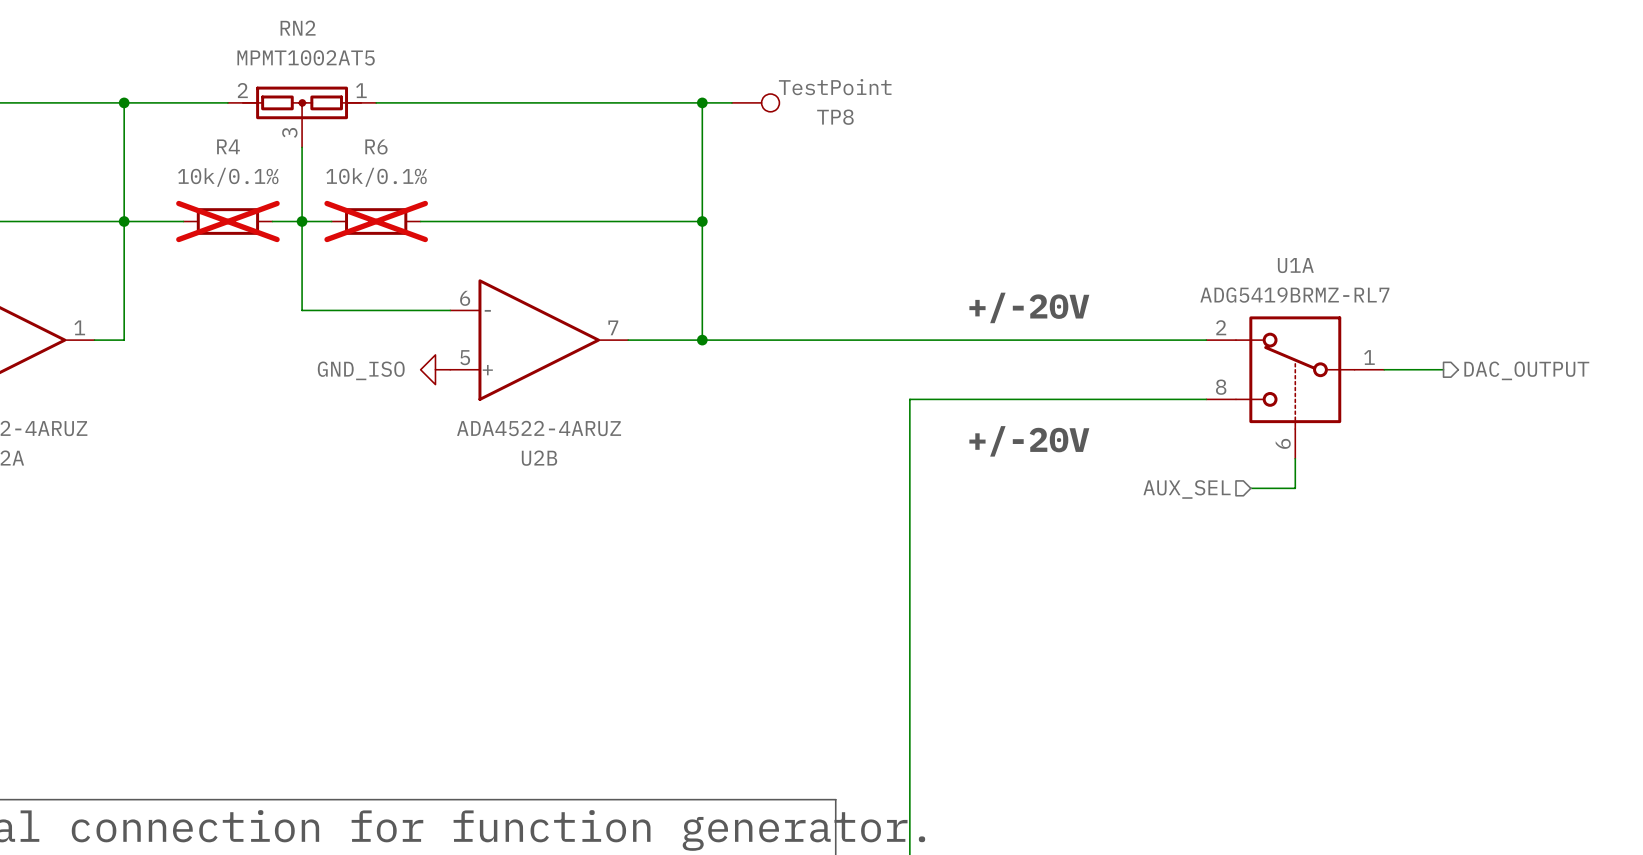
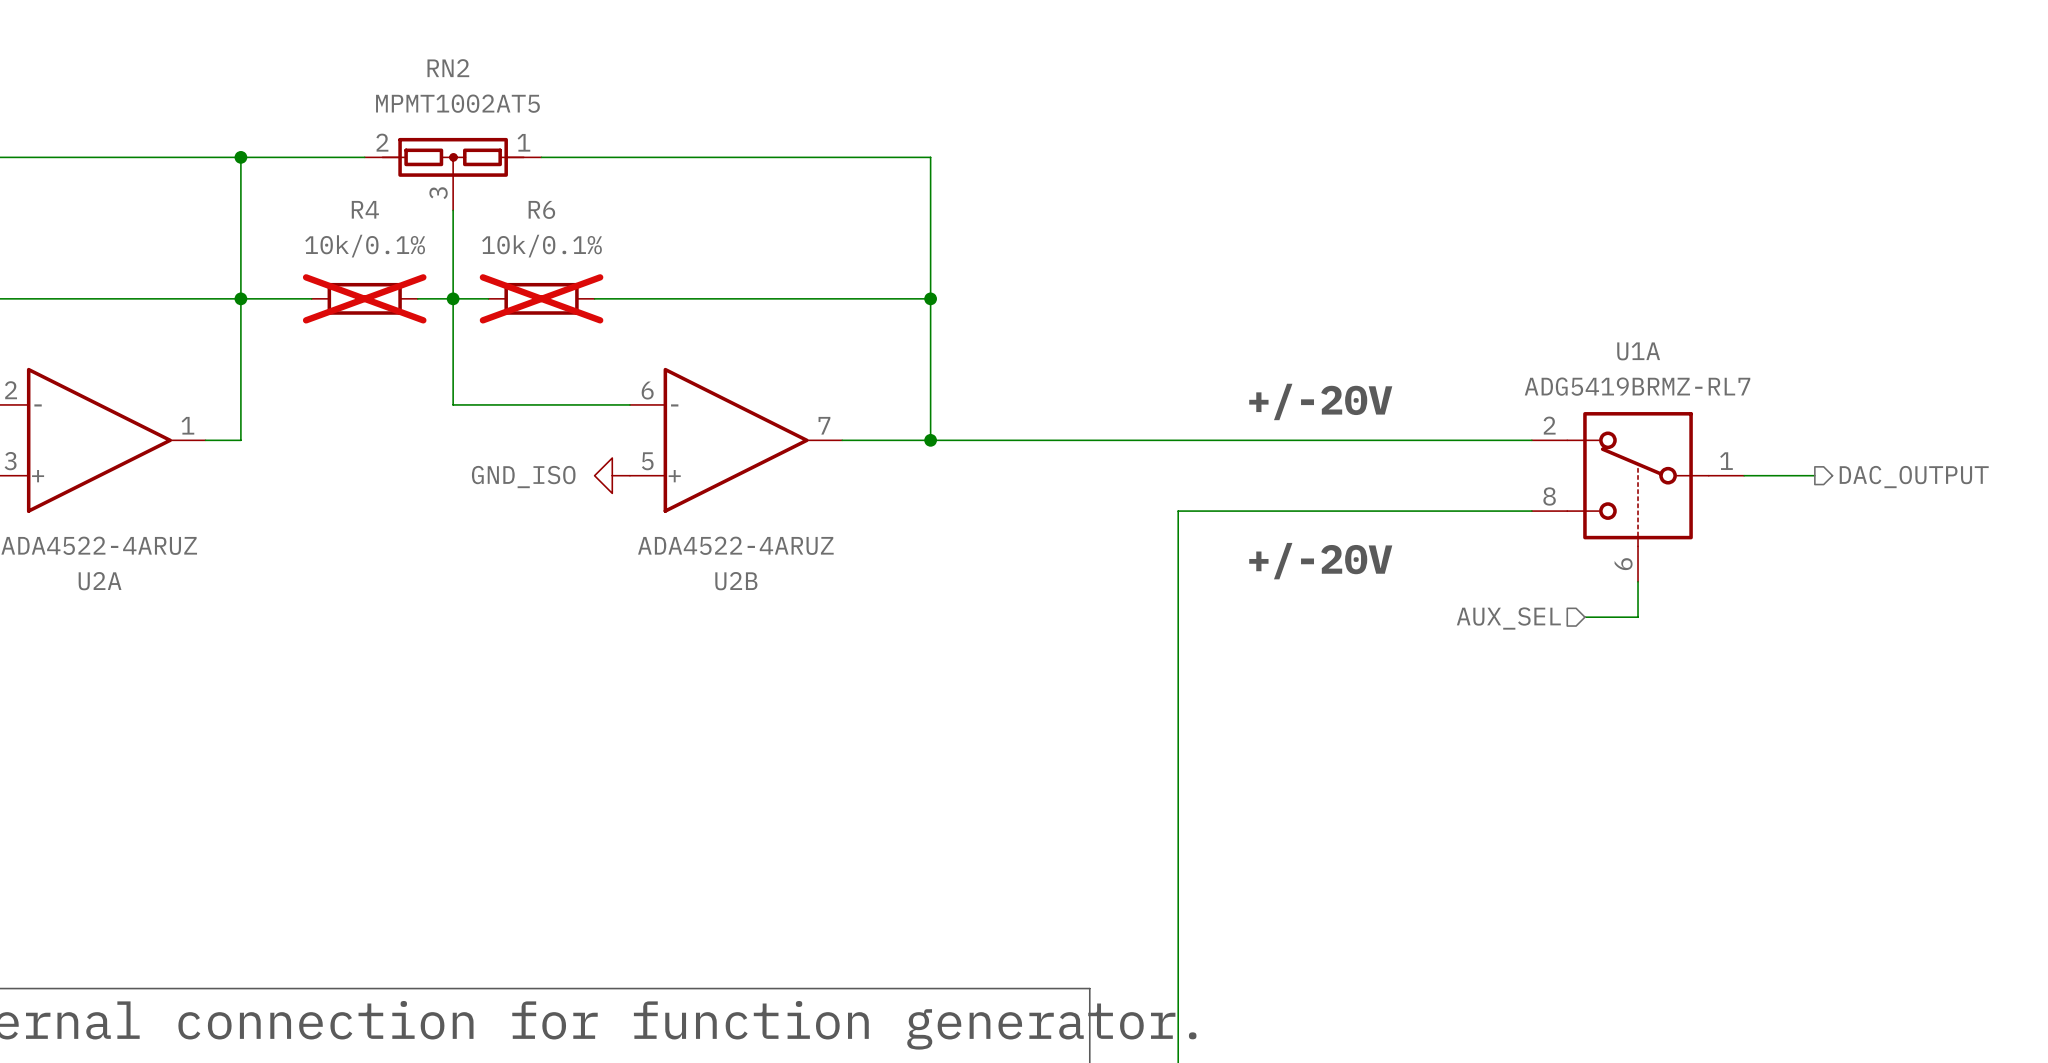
wire: (702, 102) (731, 102) -> none
junction: (702, 102) -> none
TP8: TestPoint (755, 102) -> none

